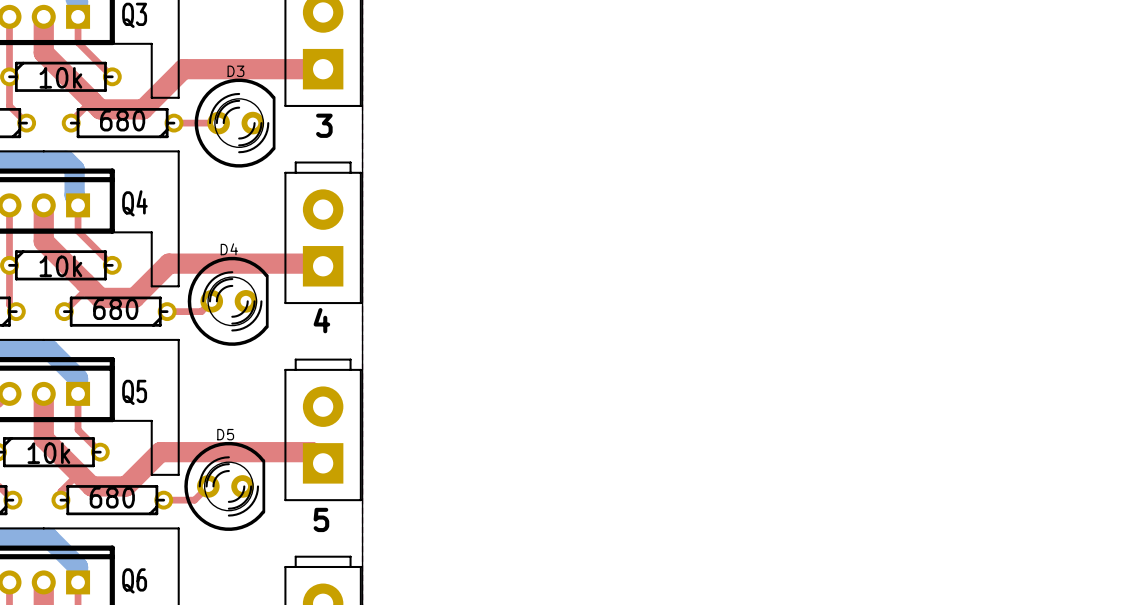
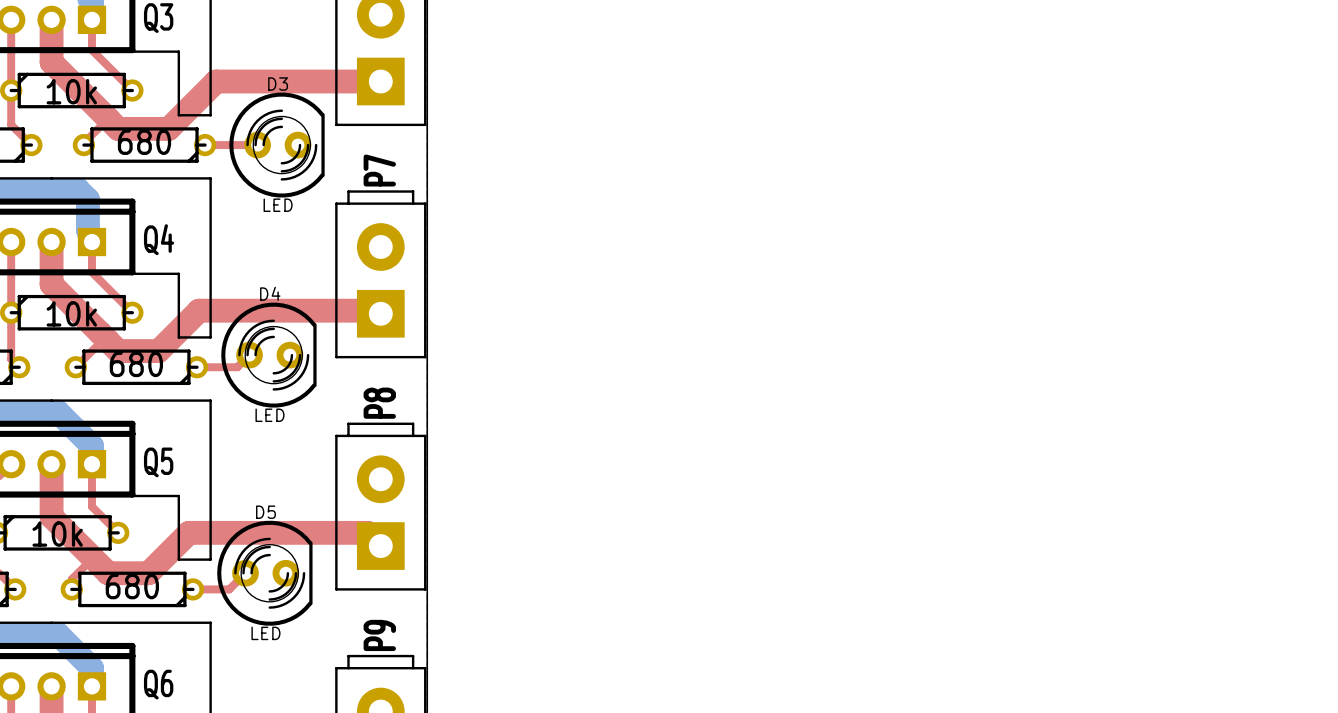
text: 3 (324, 125) -> none
P7 name: none -> P7 (379, 170)
D3 value: none -> LED (278, 205)
text: 4 (321, 320) -> none
P8 name: none -> P8 (379, 403)
D4 value: none -> LED (270, 415)
text: 5 (321, 519) -> none
D5 value: none -> LED (265, 633)
P9 name: none -> P9 (379, 635)

